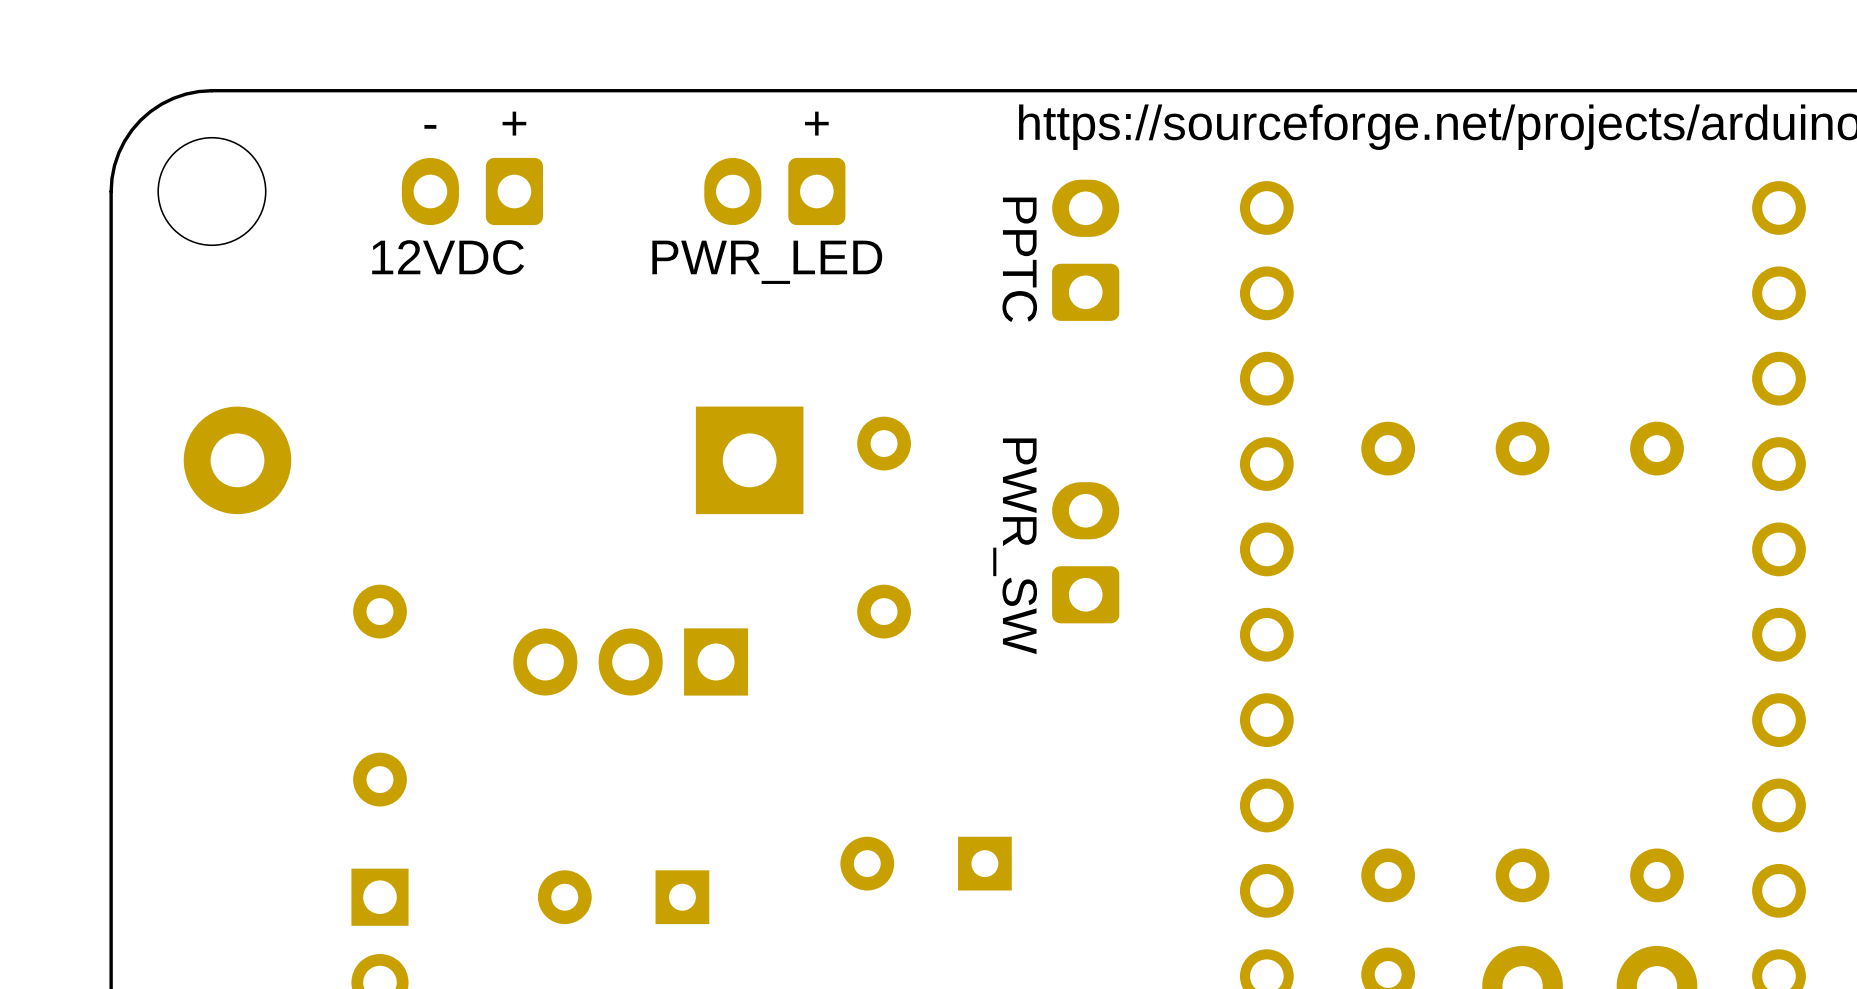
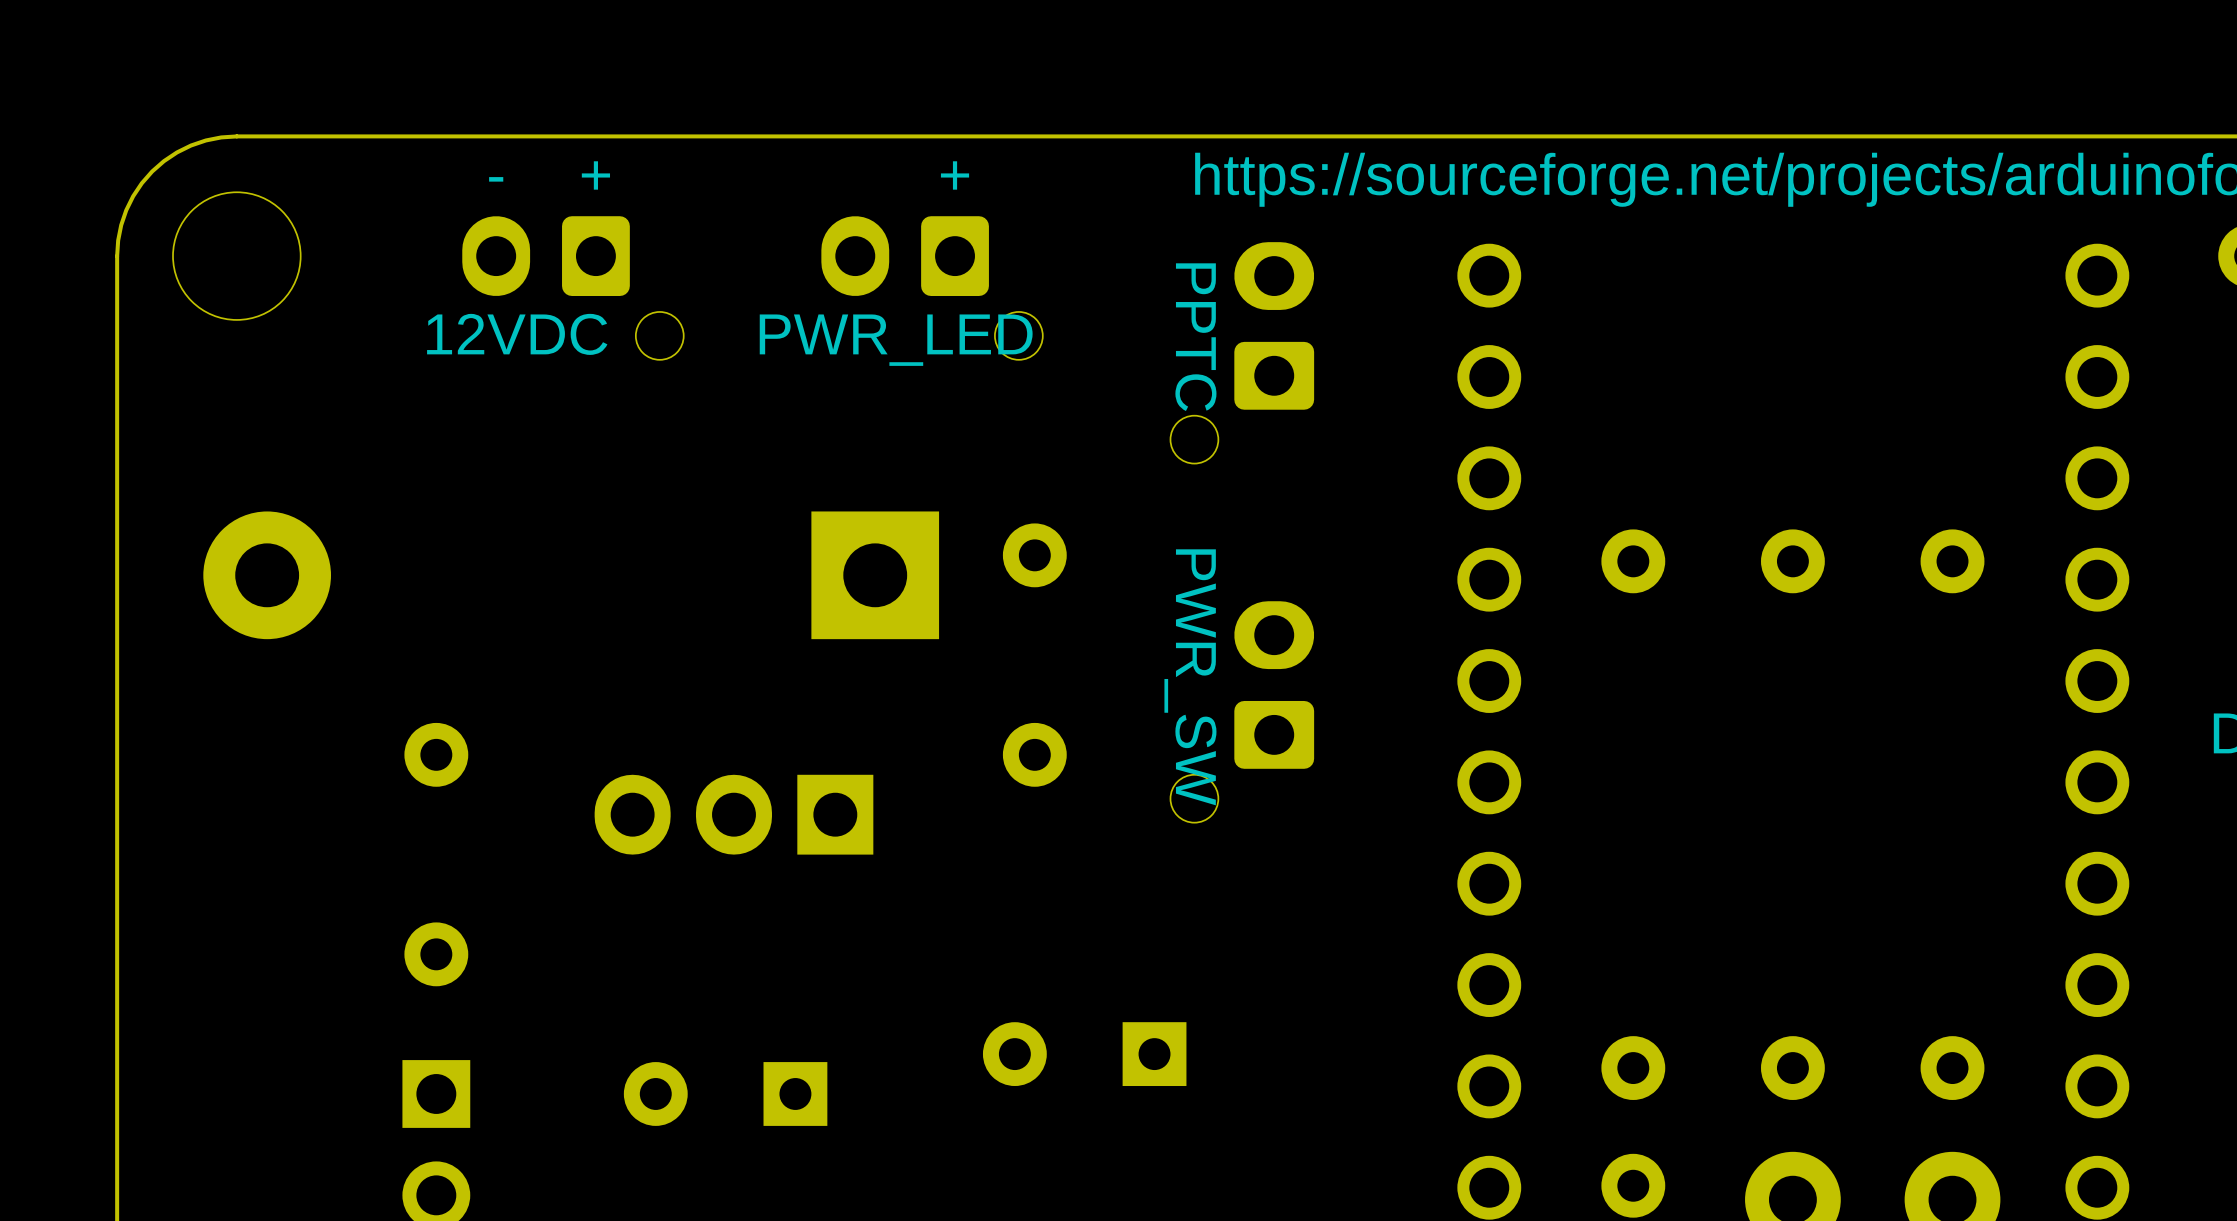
part: none -> (572, 288)
part: none -> (932, 288)
part: none -> (1242, 352)
part: none -> (1242, 711)

